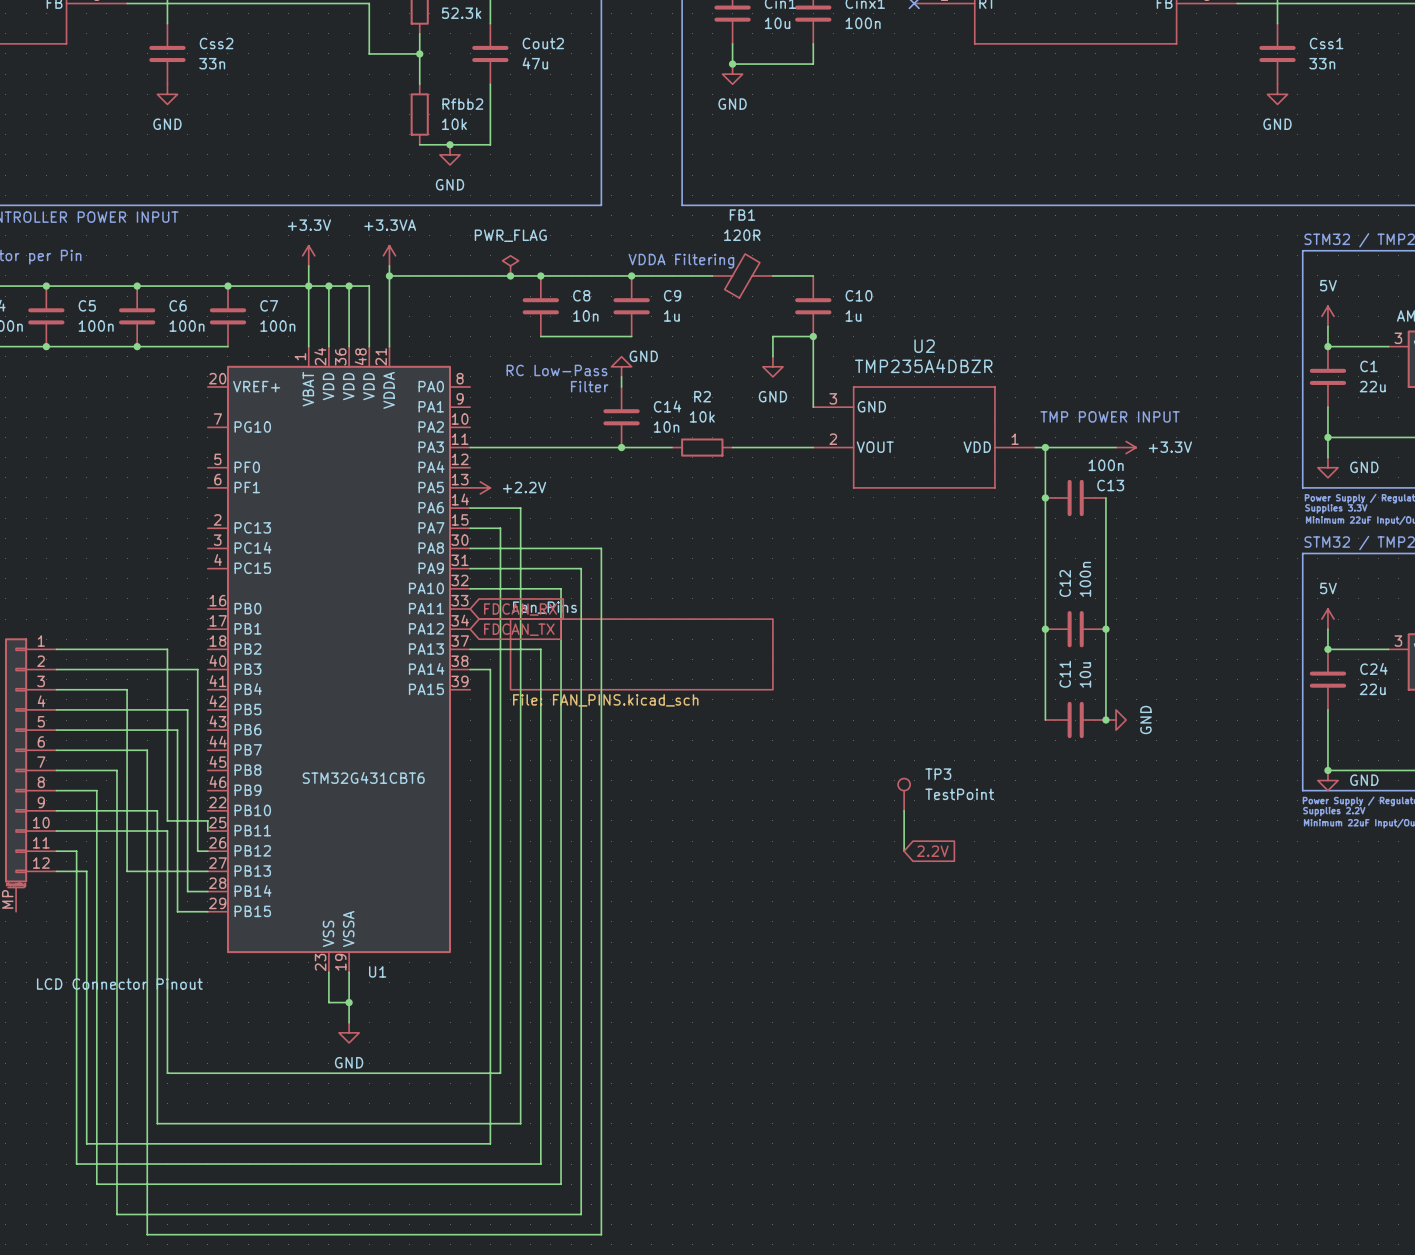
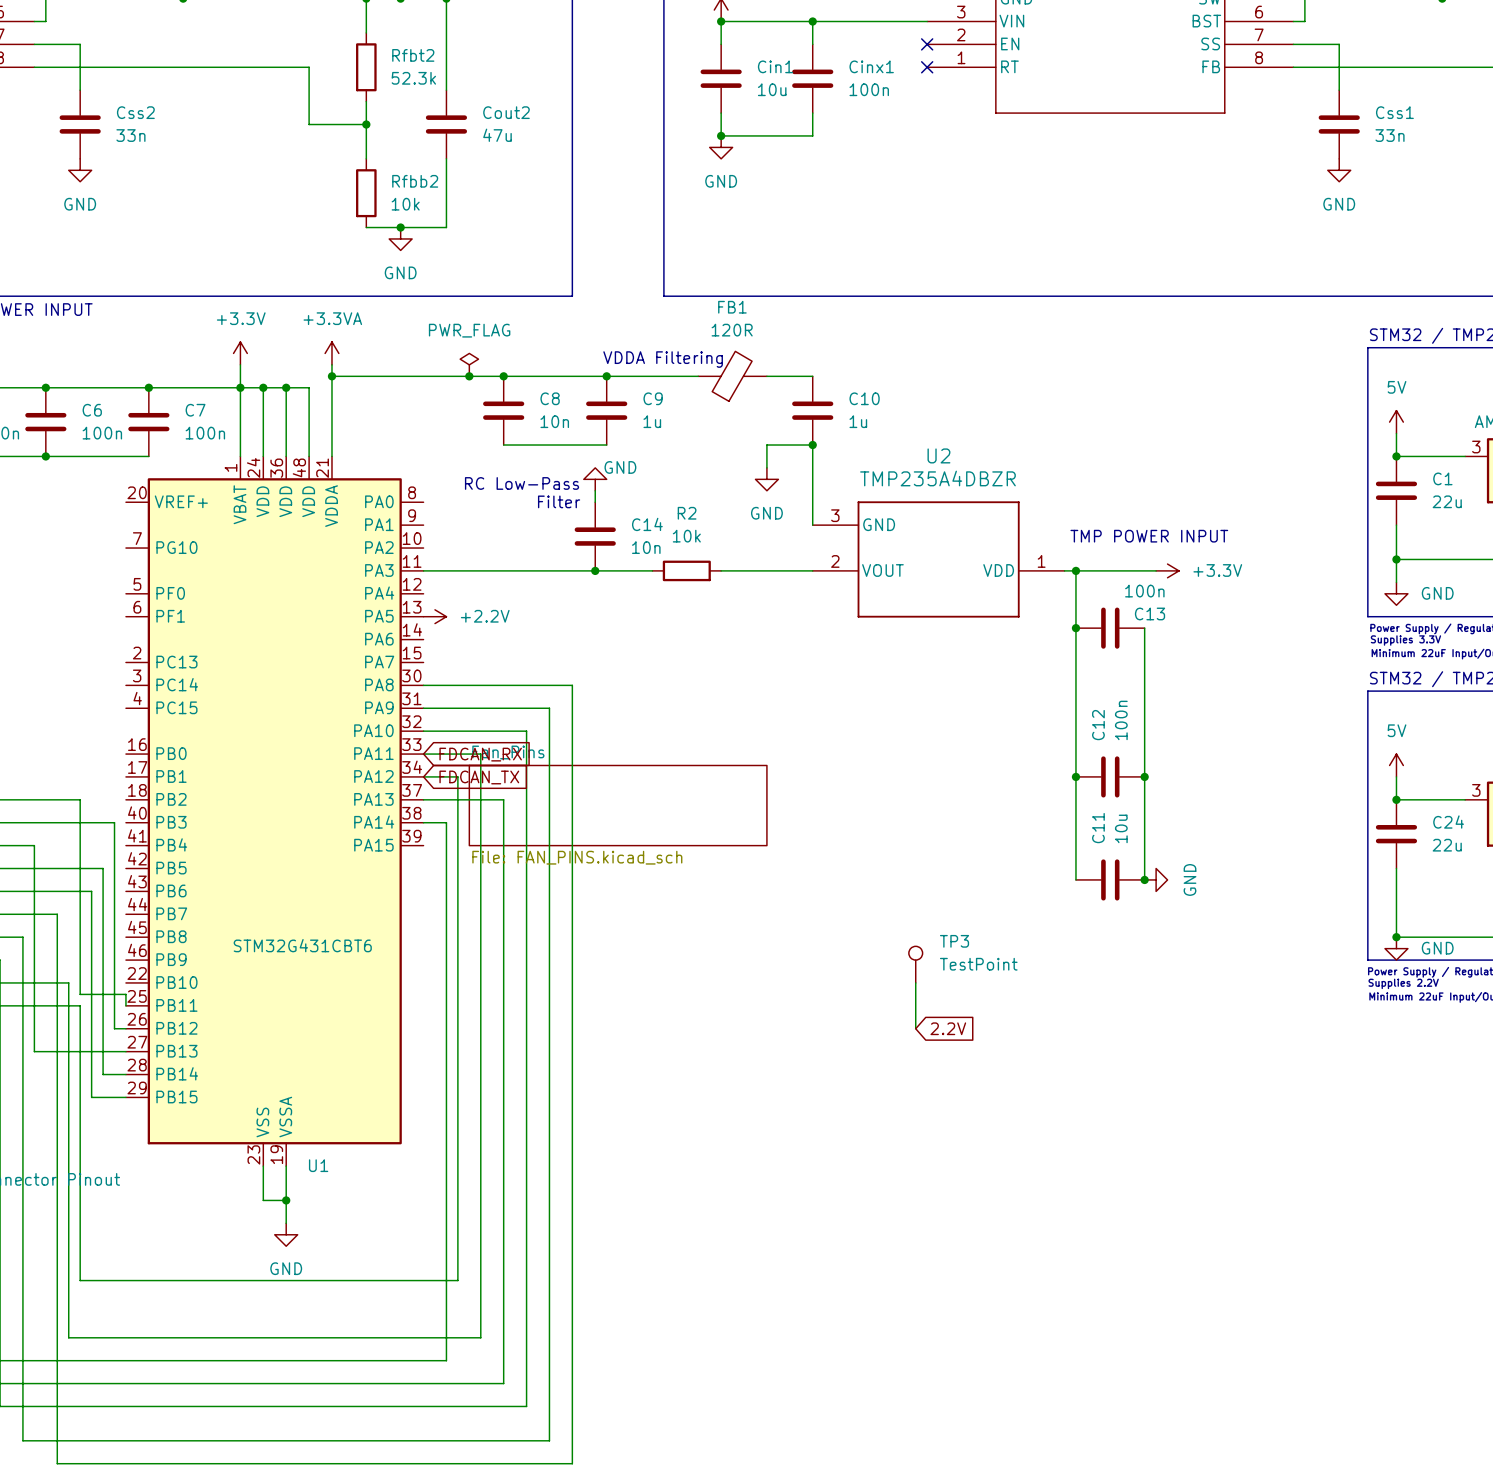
wire: (470, 508) (520, 508) (520, 609) -> (423, 754) (480, 754)
wire: (470, 528) (500, 528) (500, 629) -> (423, 776) (457, 776)

